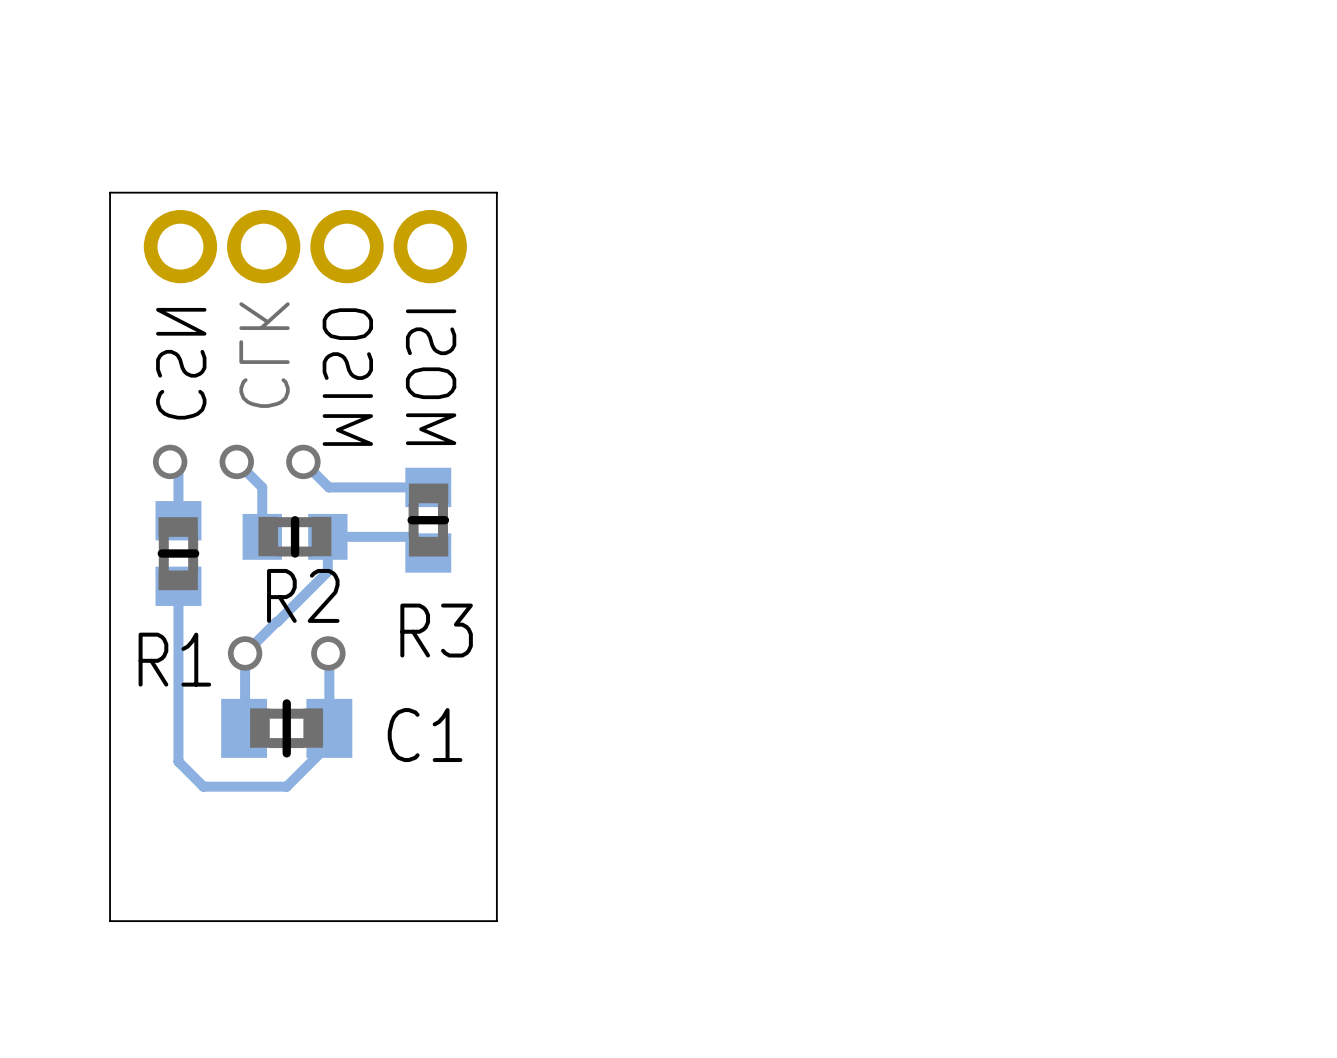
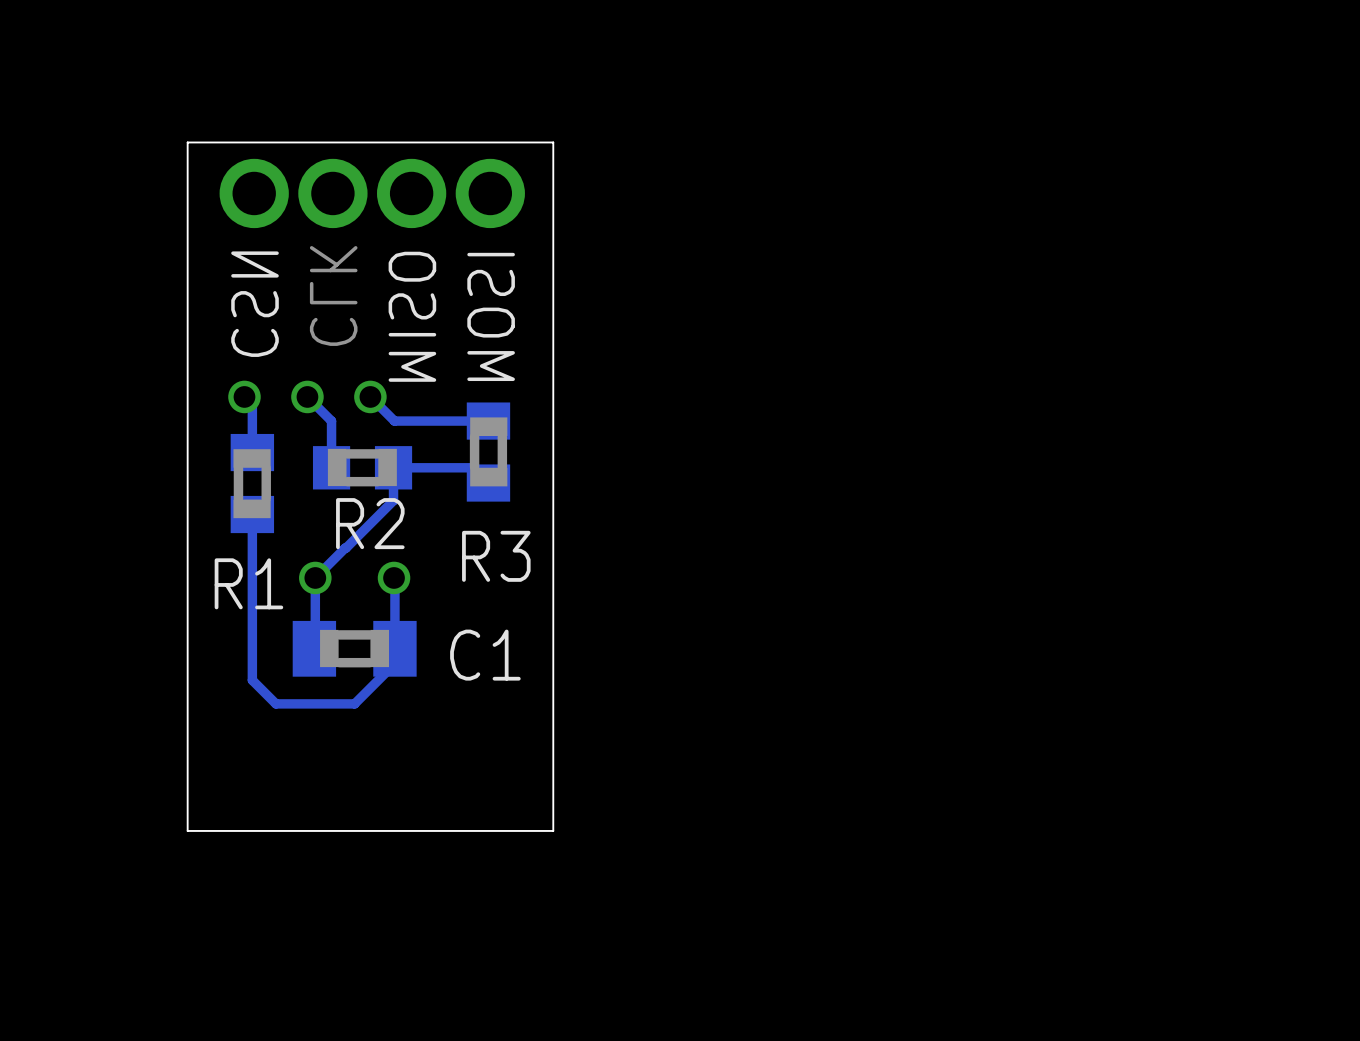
R3 footprint: [405, 467, 452, 573] -> [466, 402, 511, 502]
R1 footprint: [155, 501, 202, 606] -> [230, 433, 275, 534]
R2 footprint: [242, 513, 348, 560] -> [312, 446, 413, 490]
C1 footprint: [221, 698, 353, 758] -> [292, 620, 417, 677]

